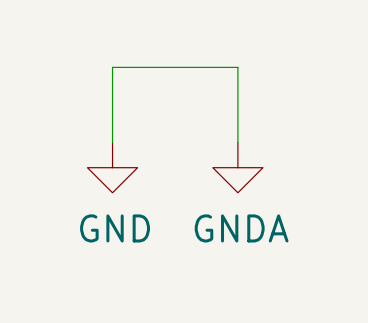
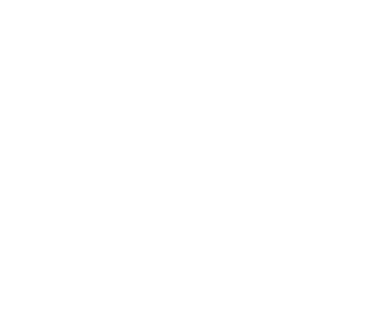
wire: (112, 142) (112, 67) (237, 67) (237, 142) -> none
power symbol: GND (112, 167) -> none
power symbol: GNDA (237, 167) -> none

